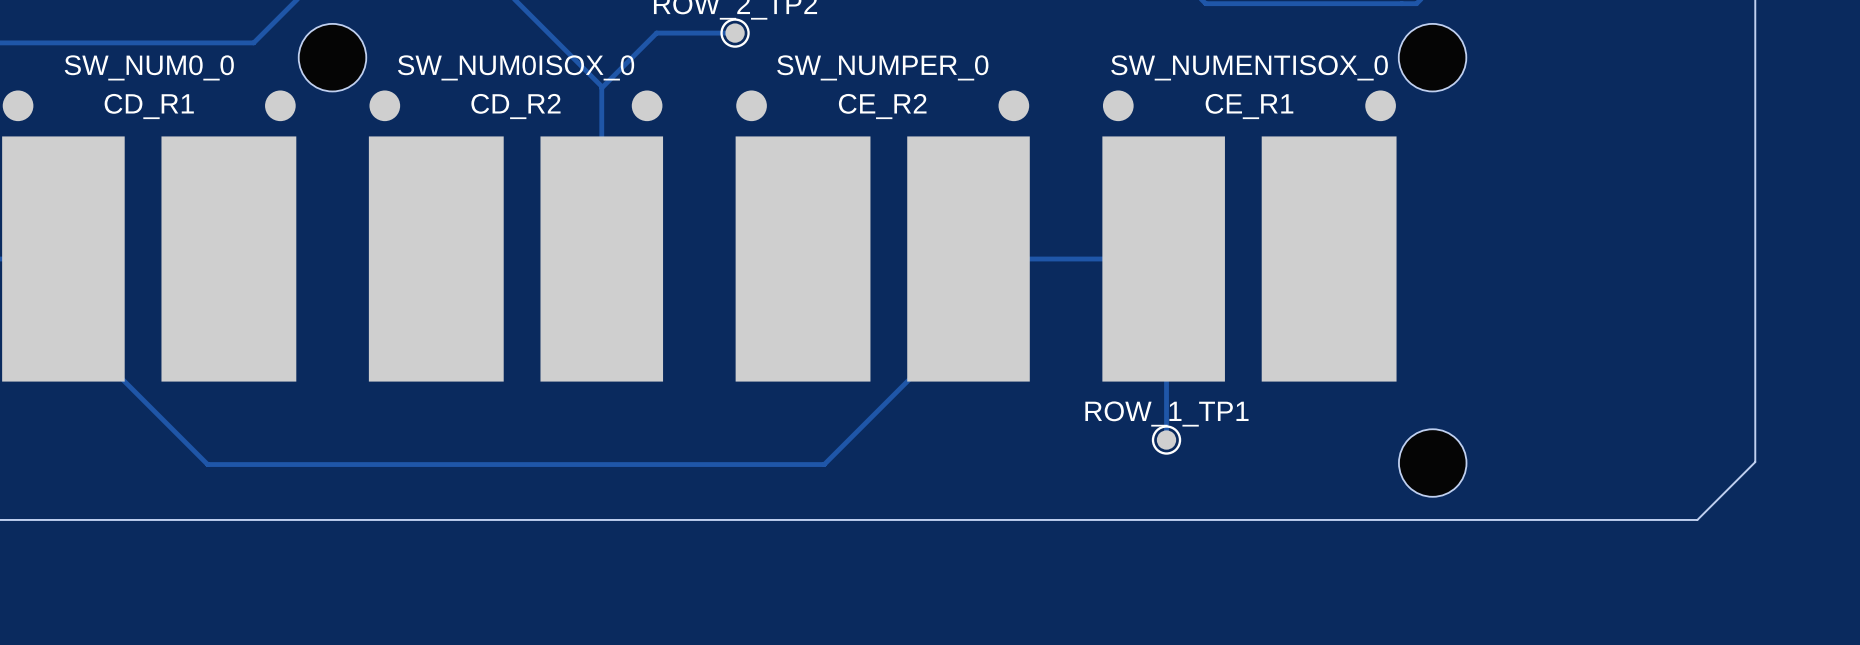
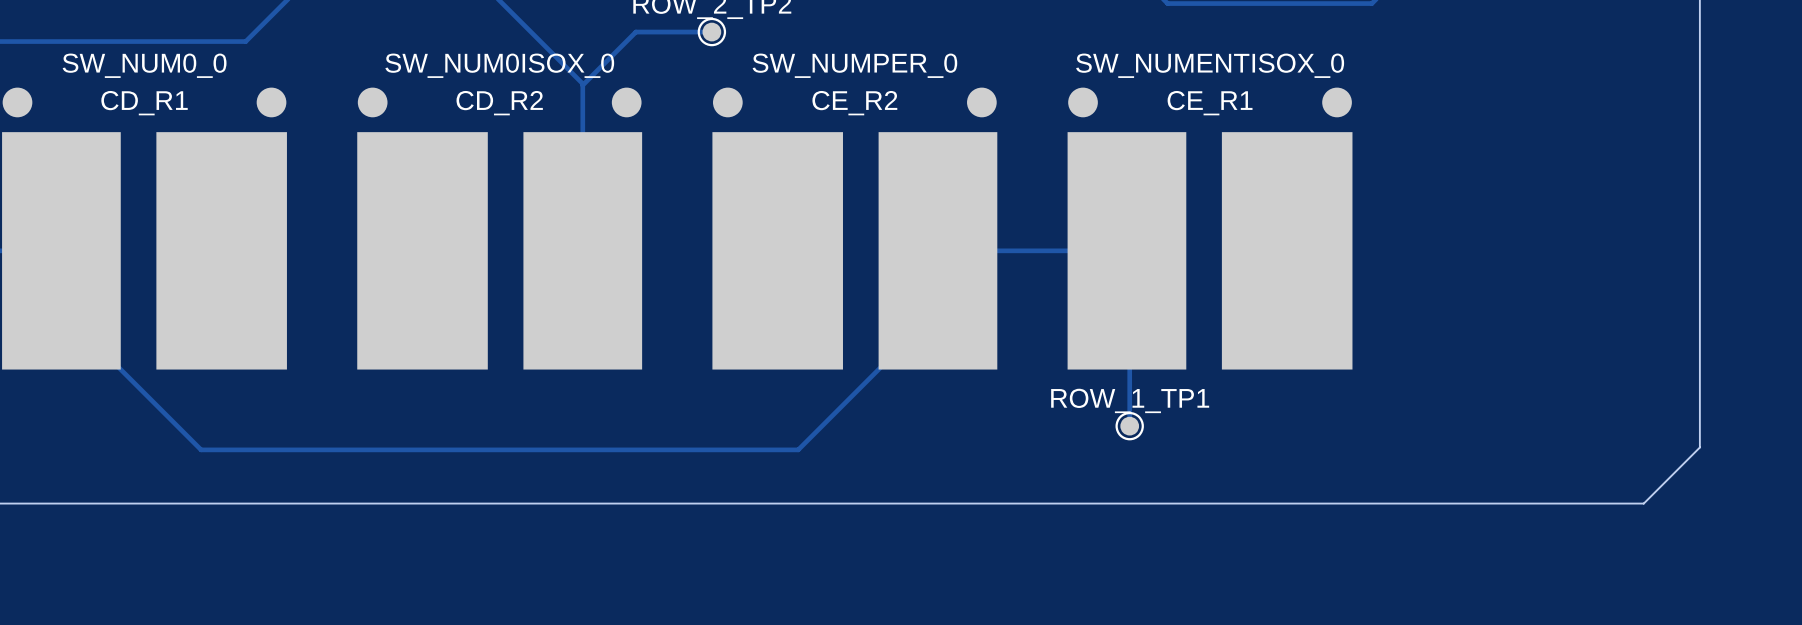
part: (332, 57) -> none
part: (1432, 57) -> none
part: (1432, 463) -> none

